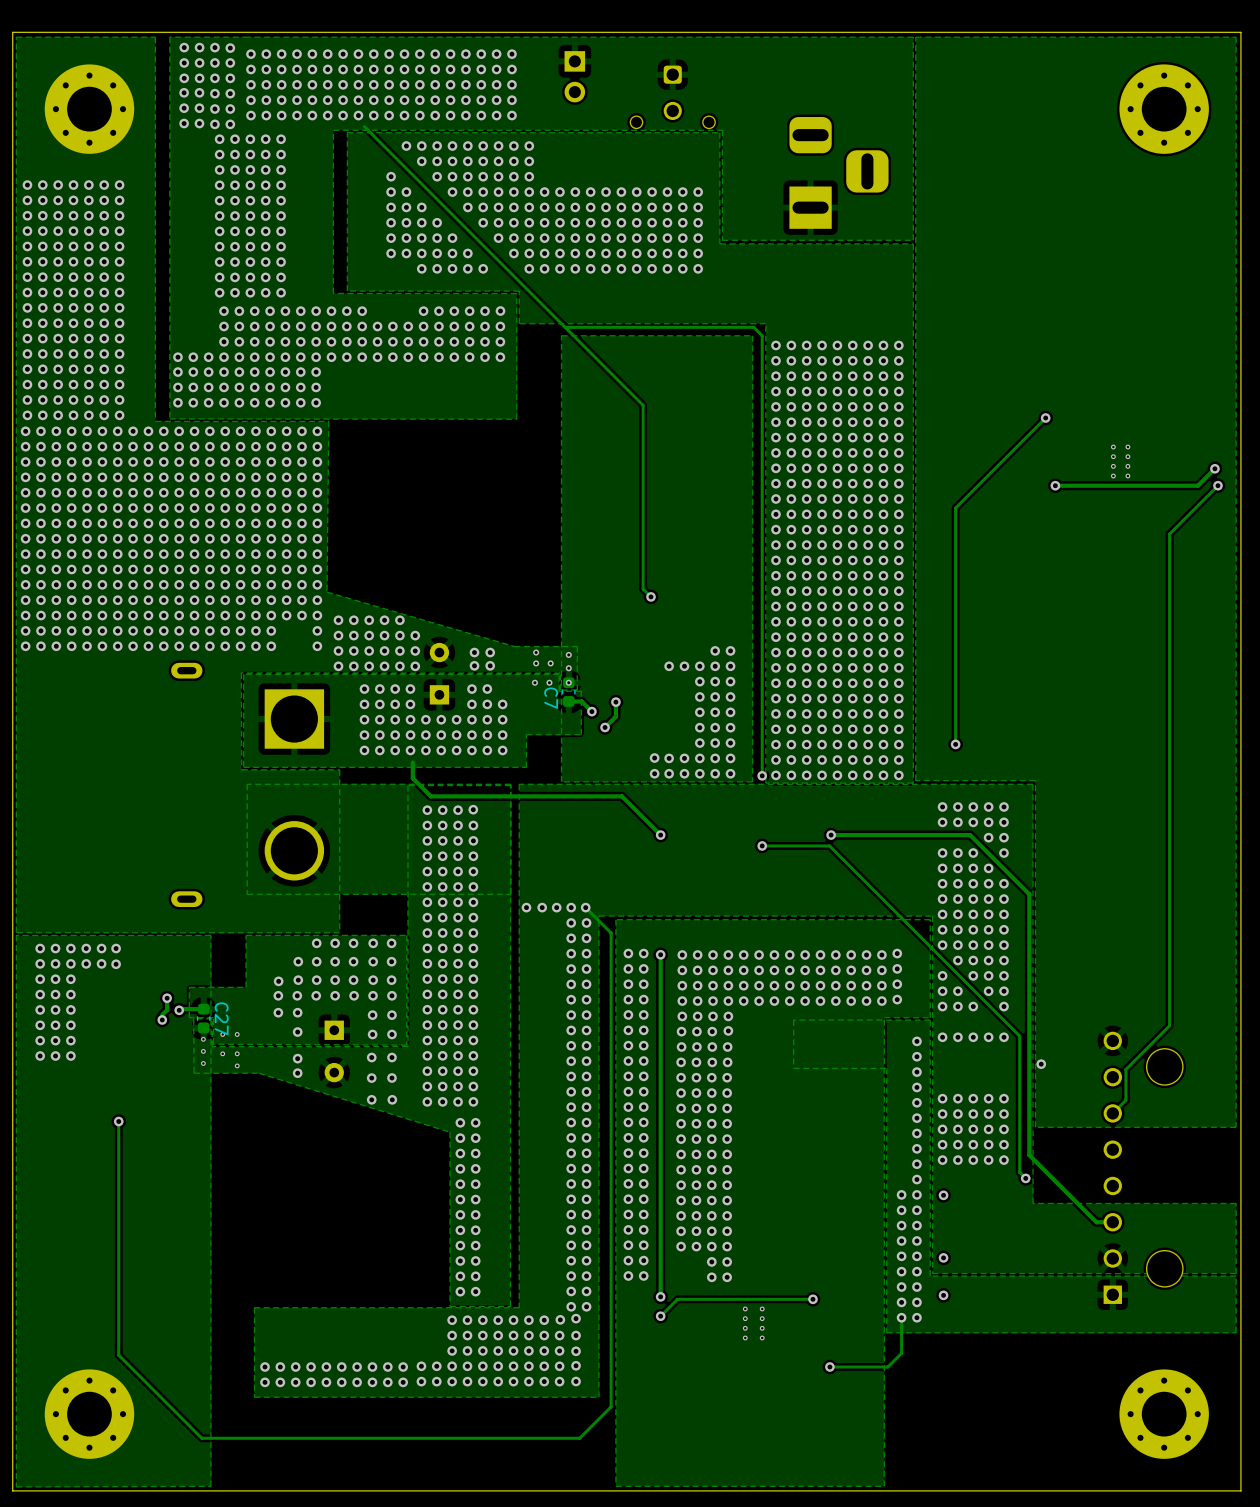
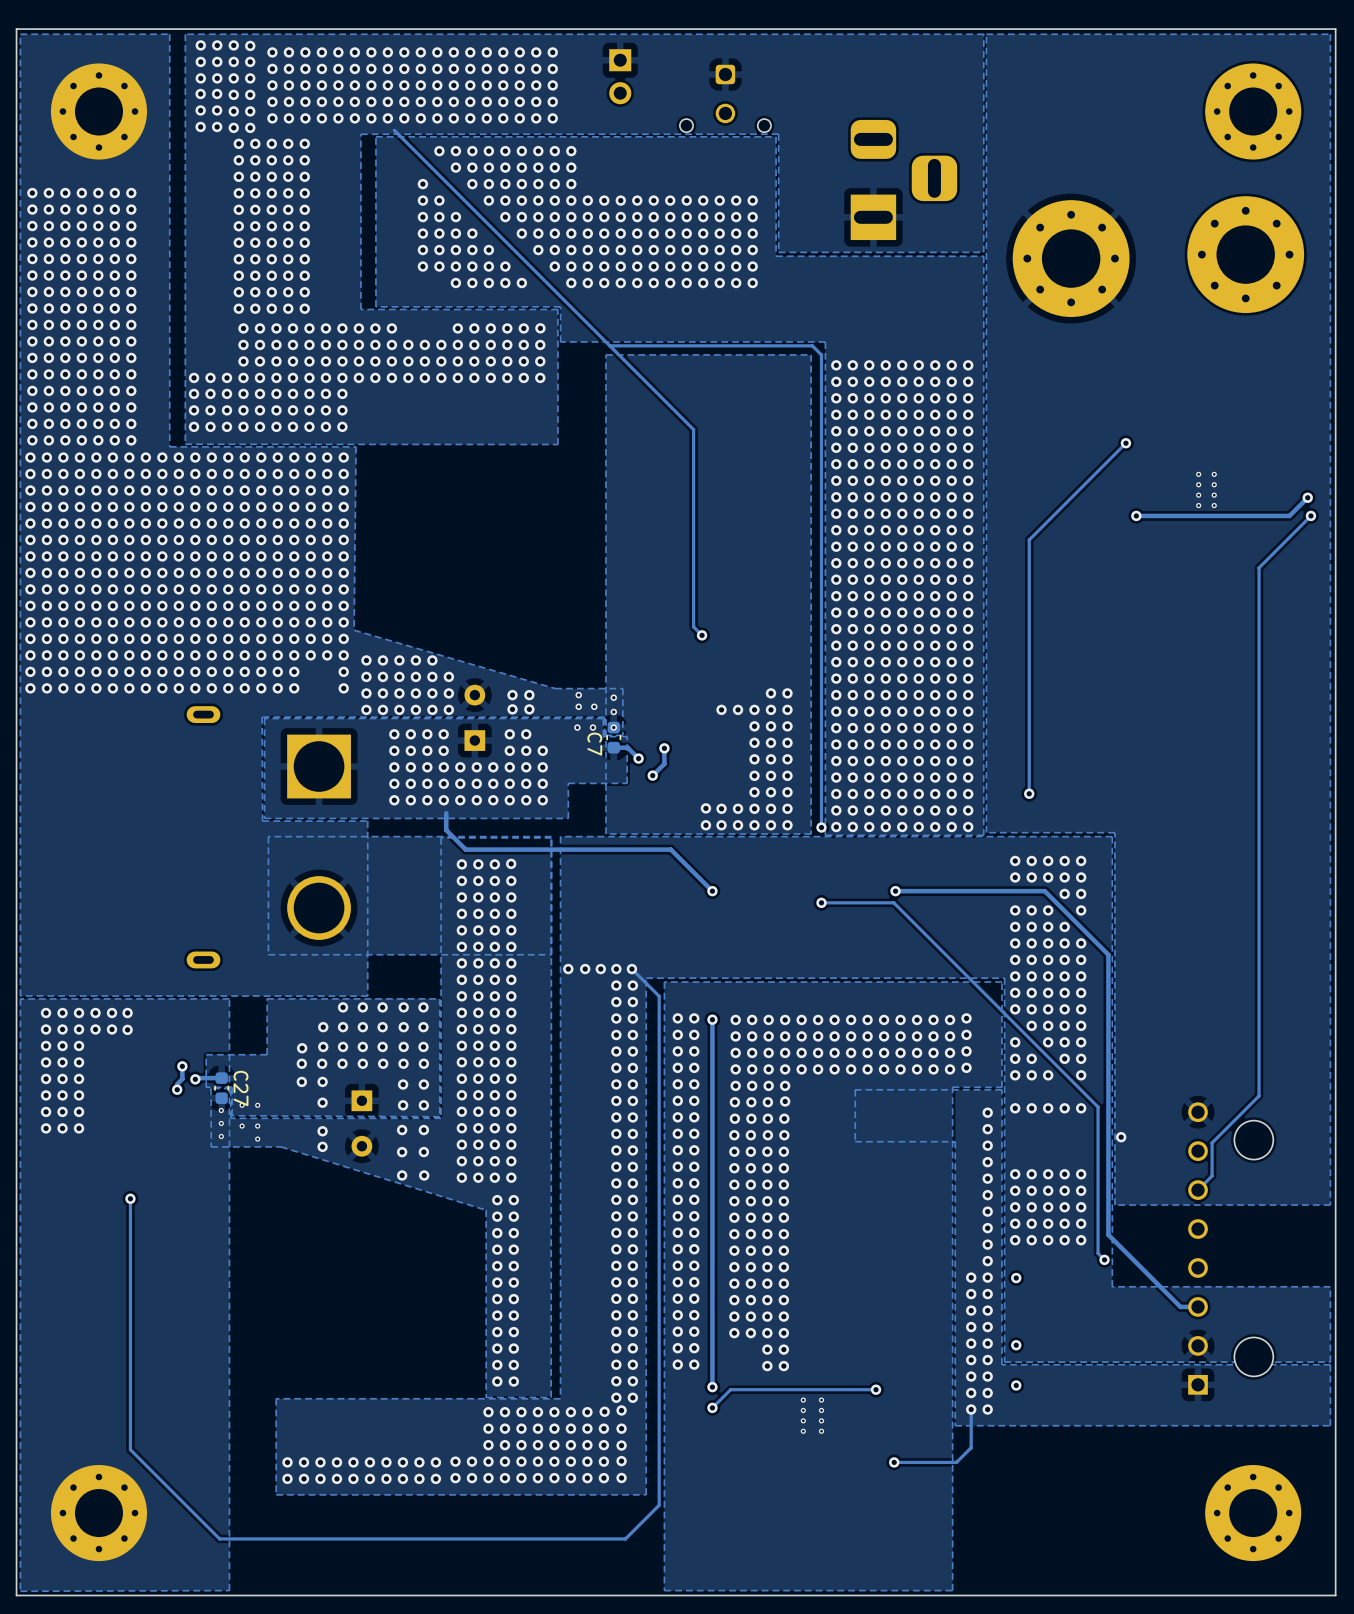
part: none -> (1245, 254)
part: none -> (1071, 258)

